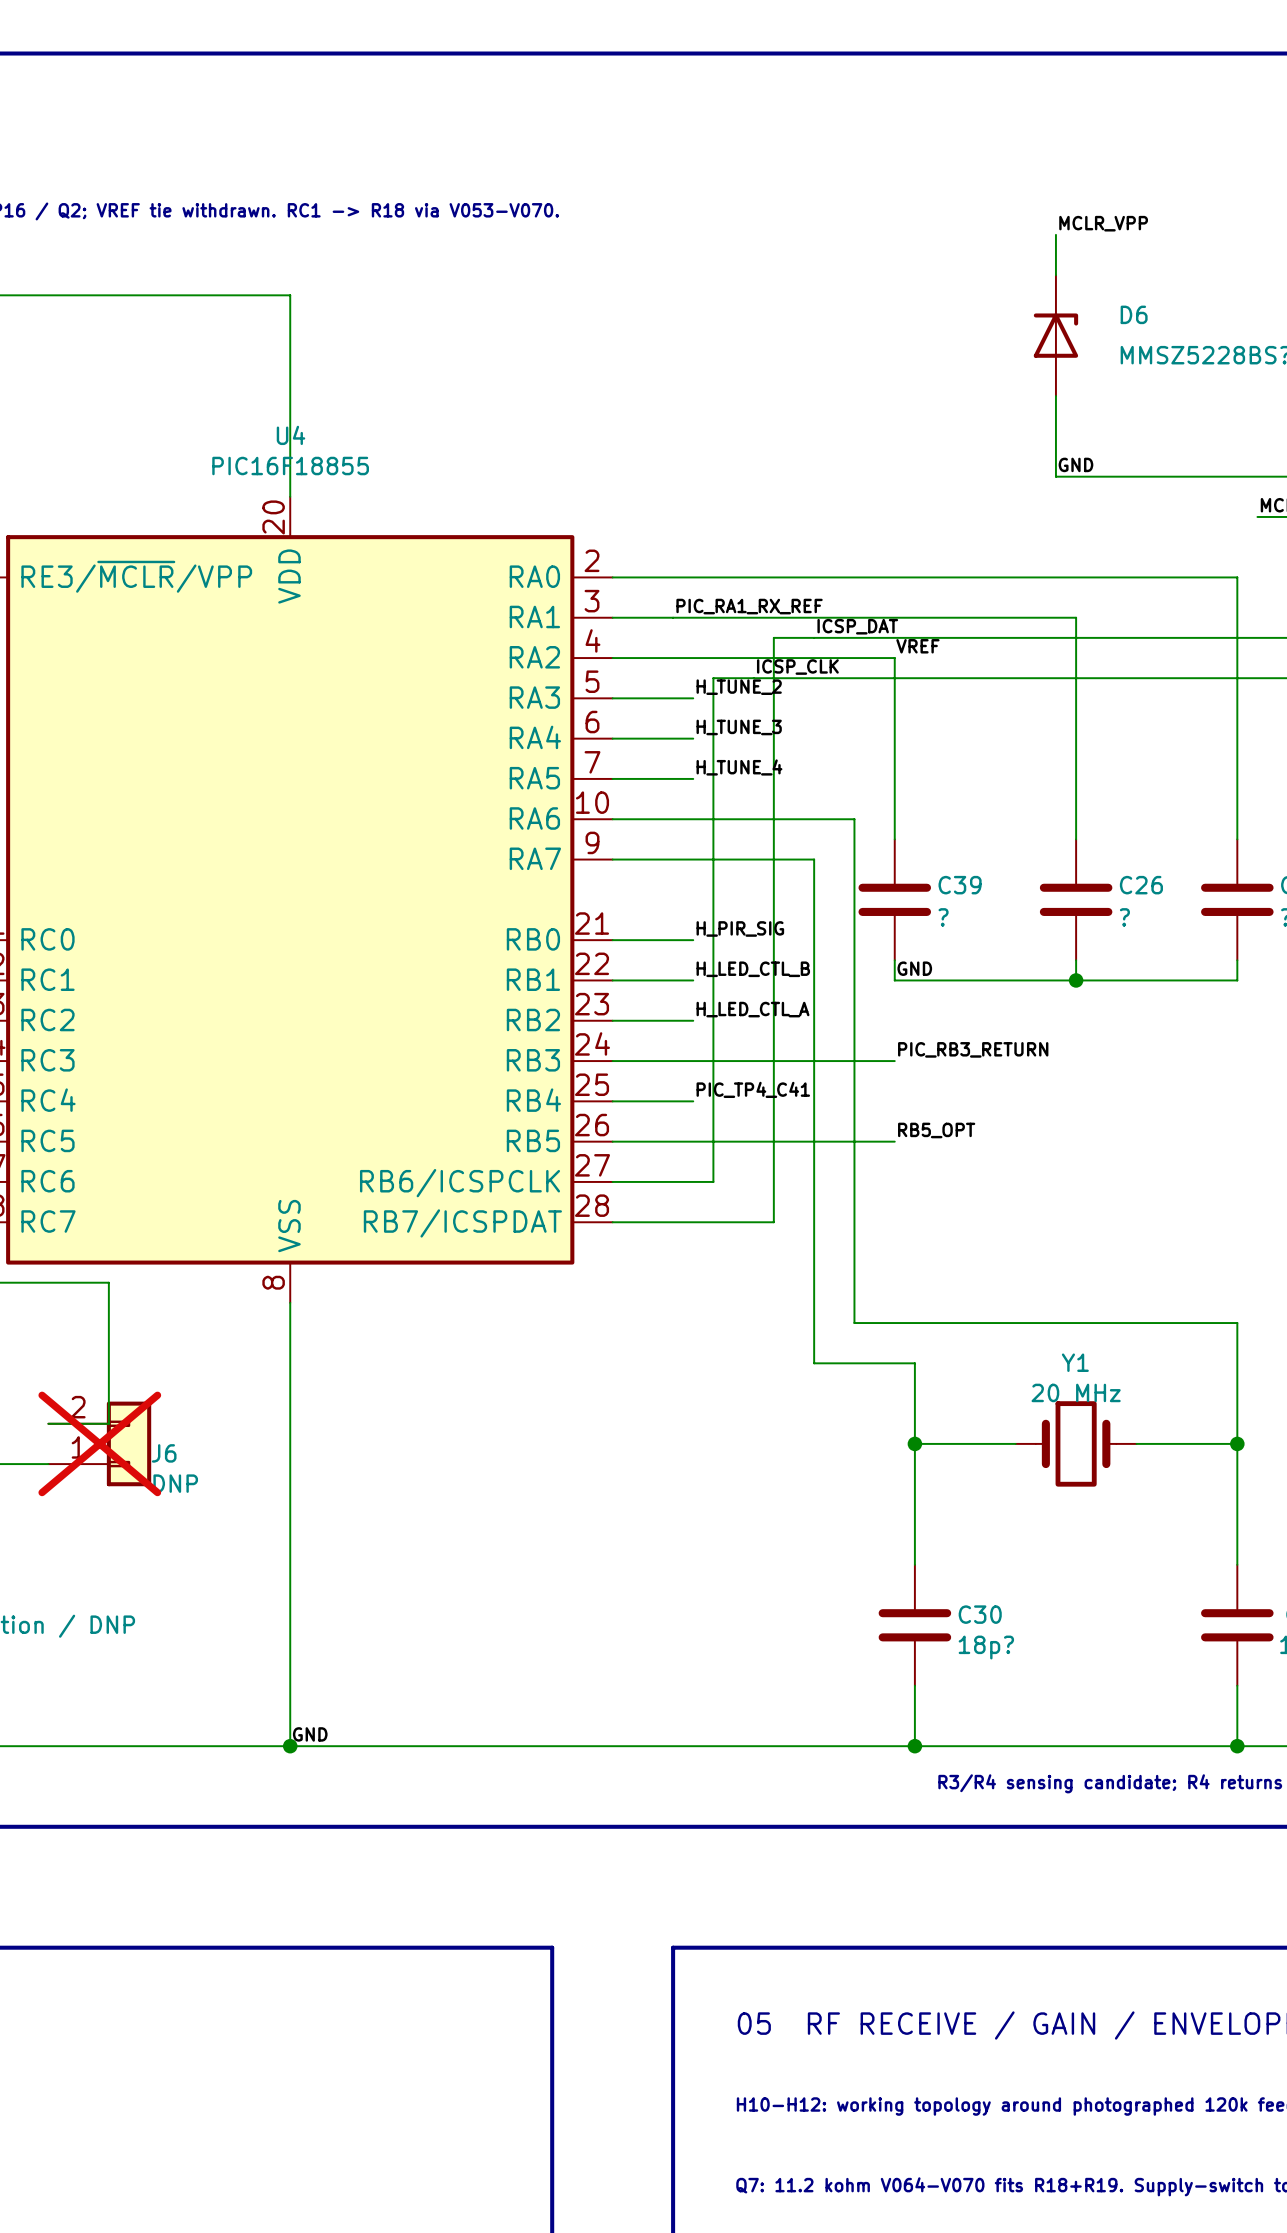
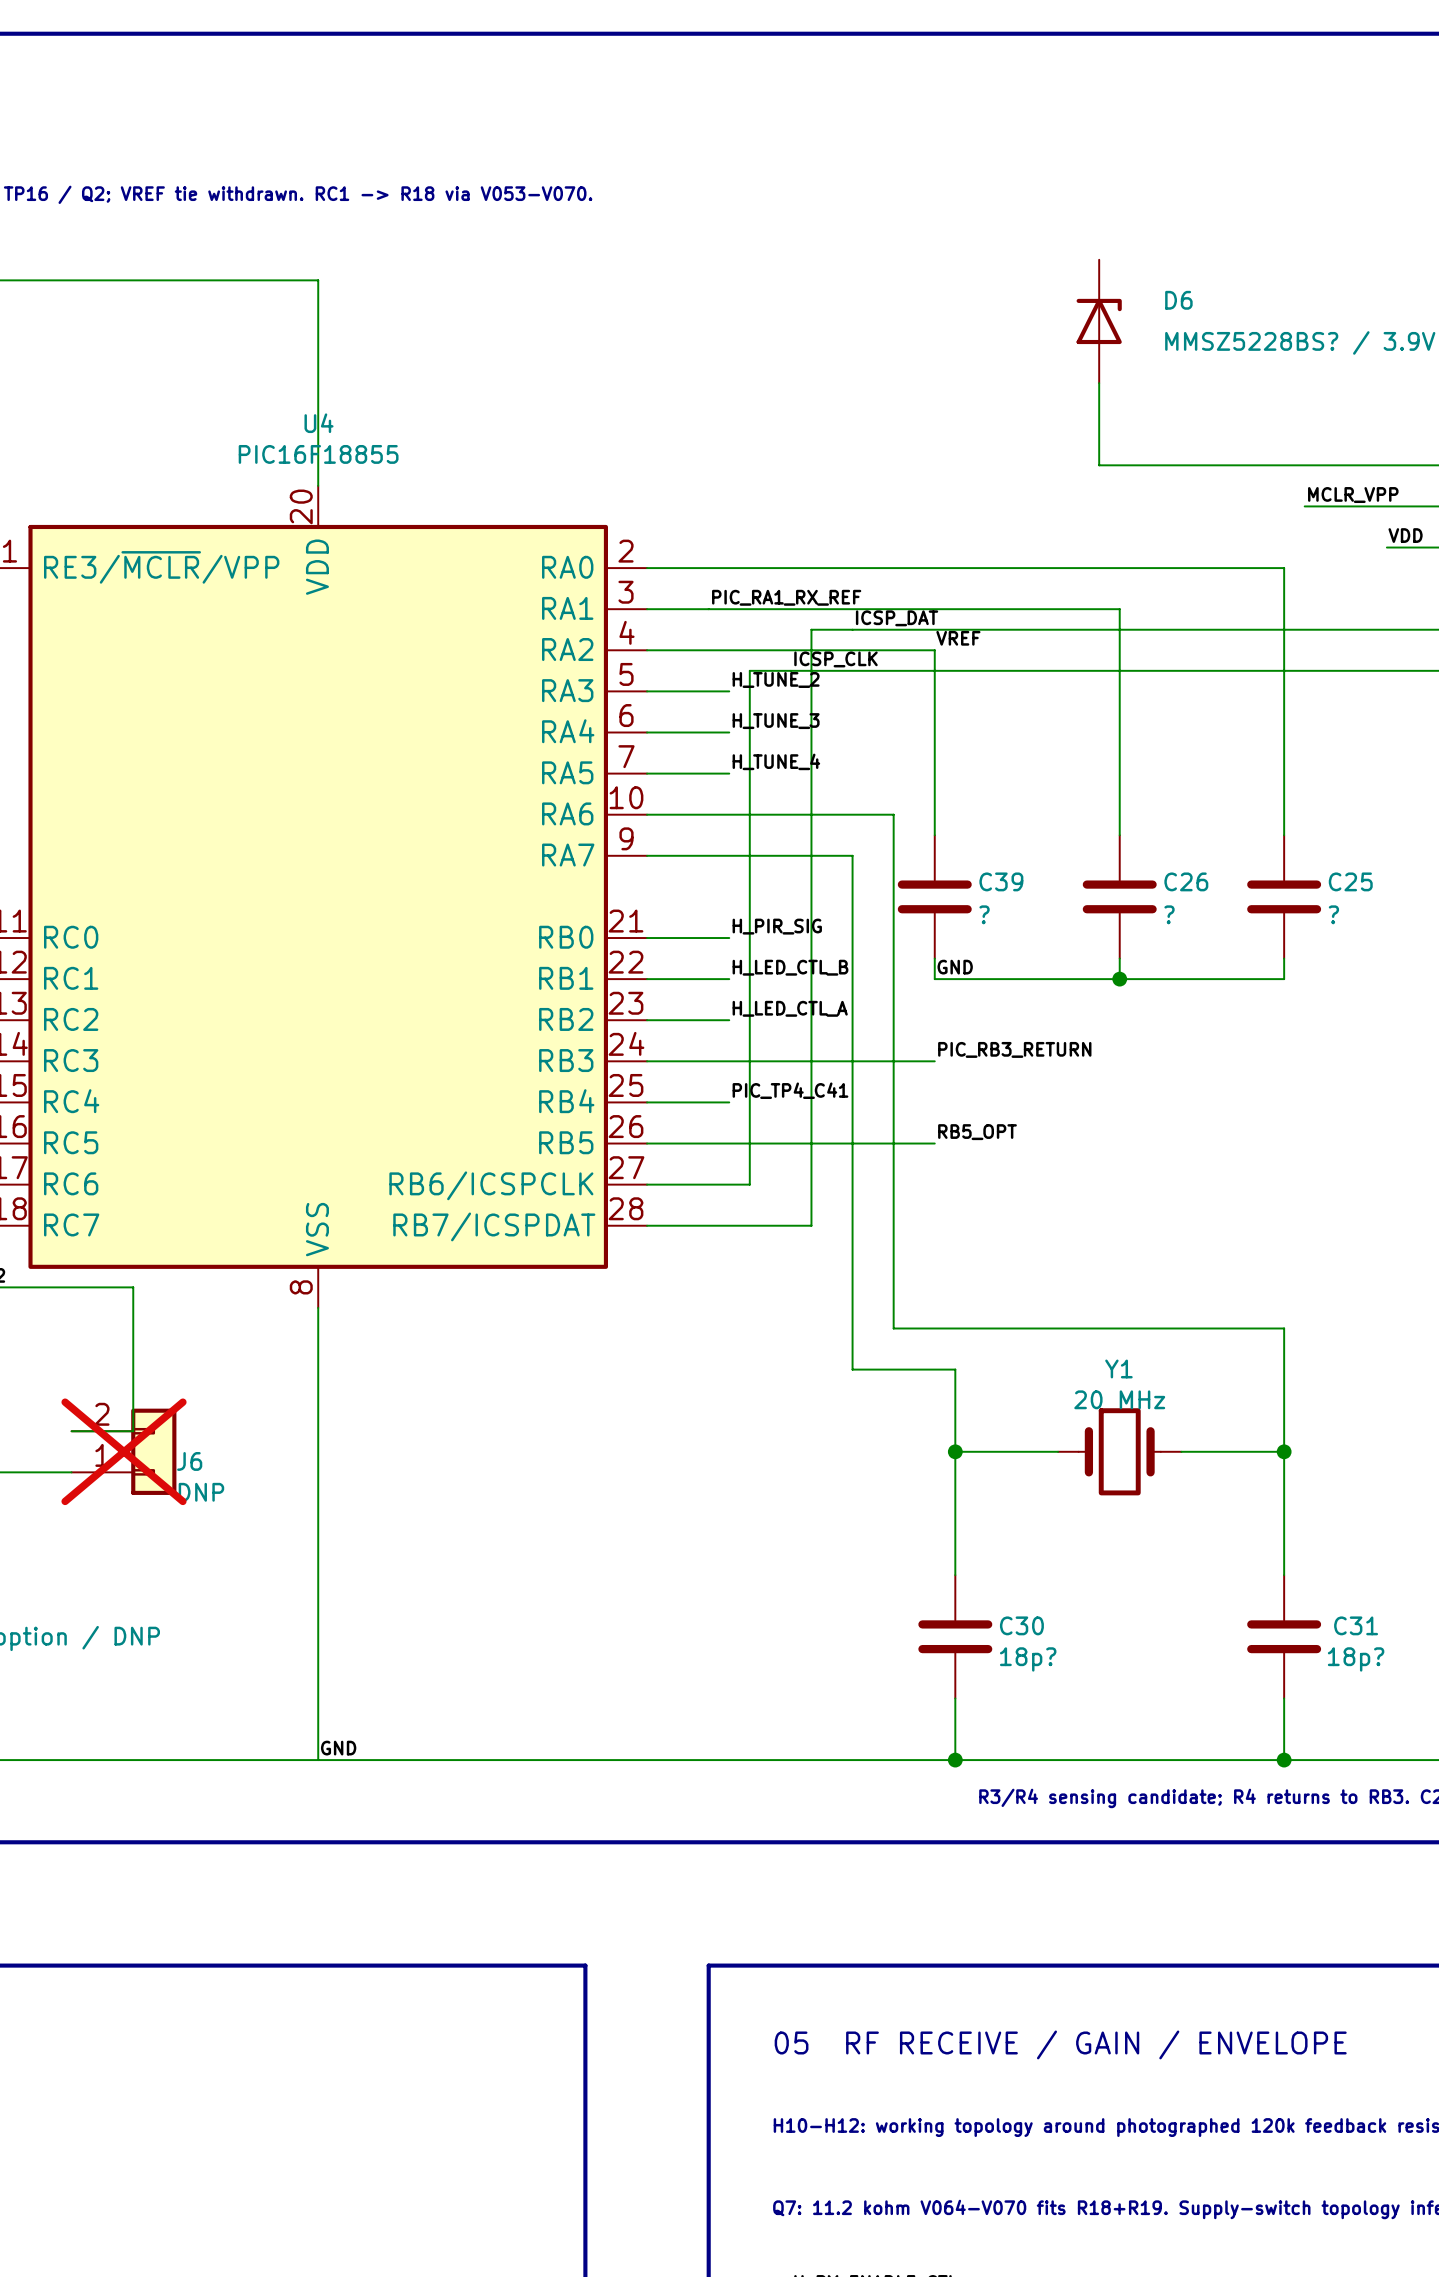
label: MCLR_VPP (1103, 223) -> none
wire: (1055, 234) (1055, 275) -> none
label: GND (1075, 464) -> none
junction: (290, 1746) -> none

